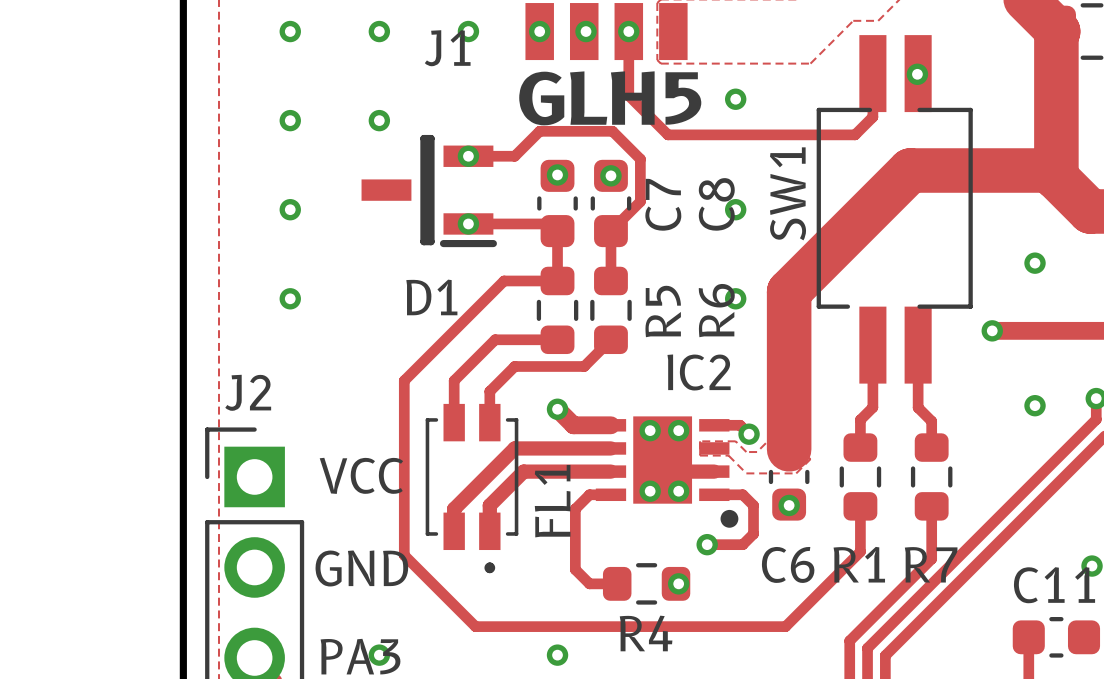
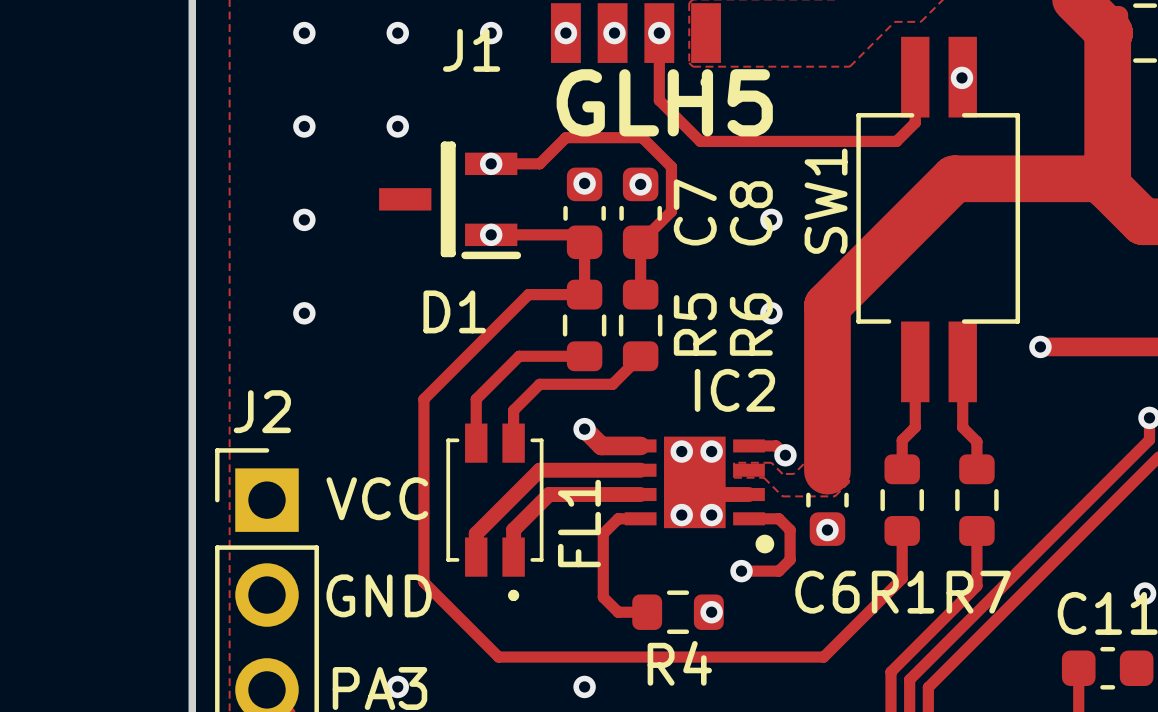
via: (735, 99) -> none
via: (1035, 263) -> none
via: (1035, 405) -> none

